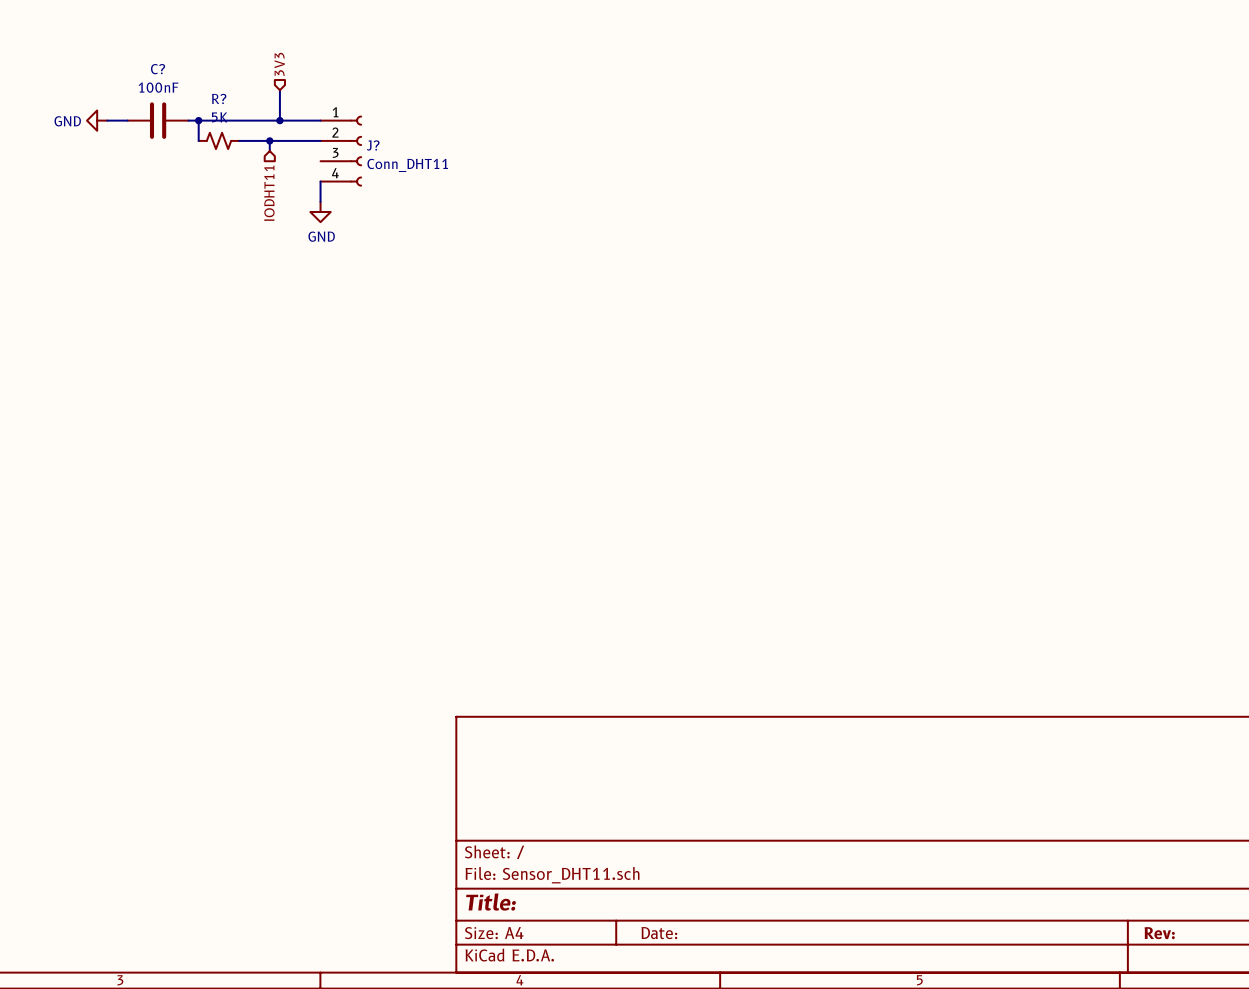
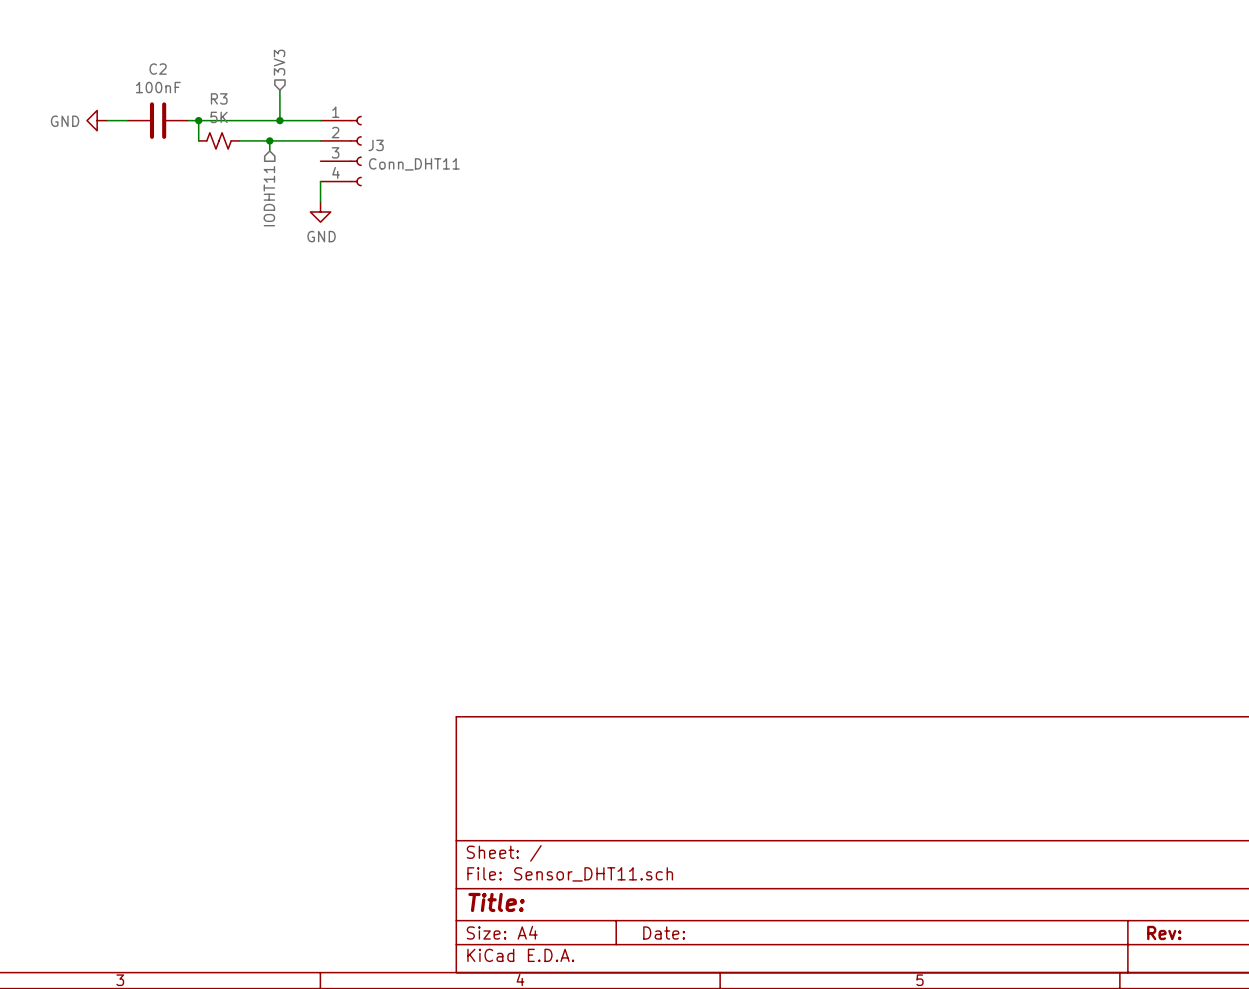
C? name: C? (158, 69) -> C2 (158, 69)
R? name: R? (219, 98) -> R3 (219, 98)
J? name: J? (373, 145) -> J3 (376, 145)

